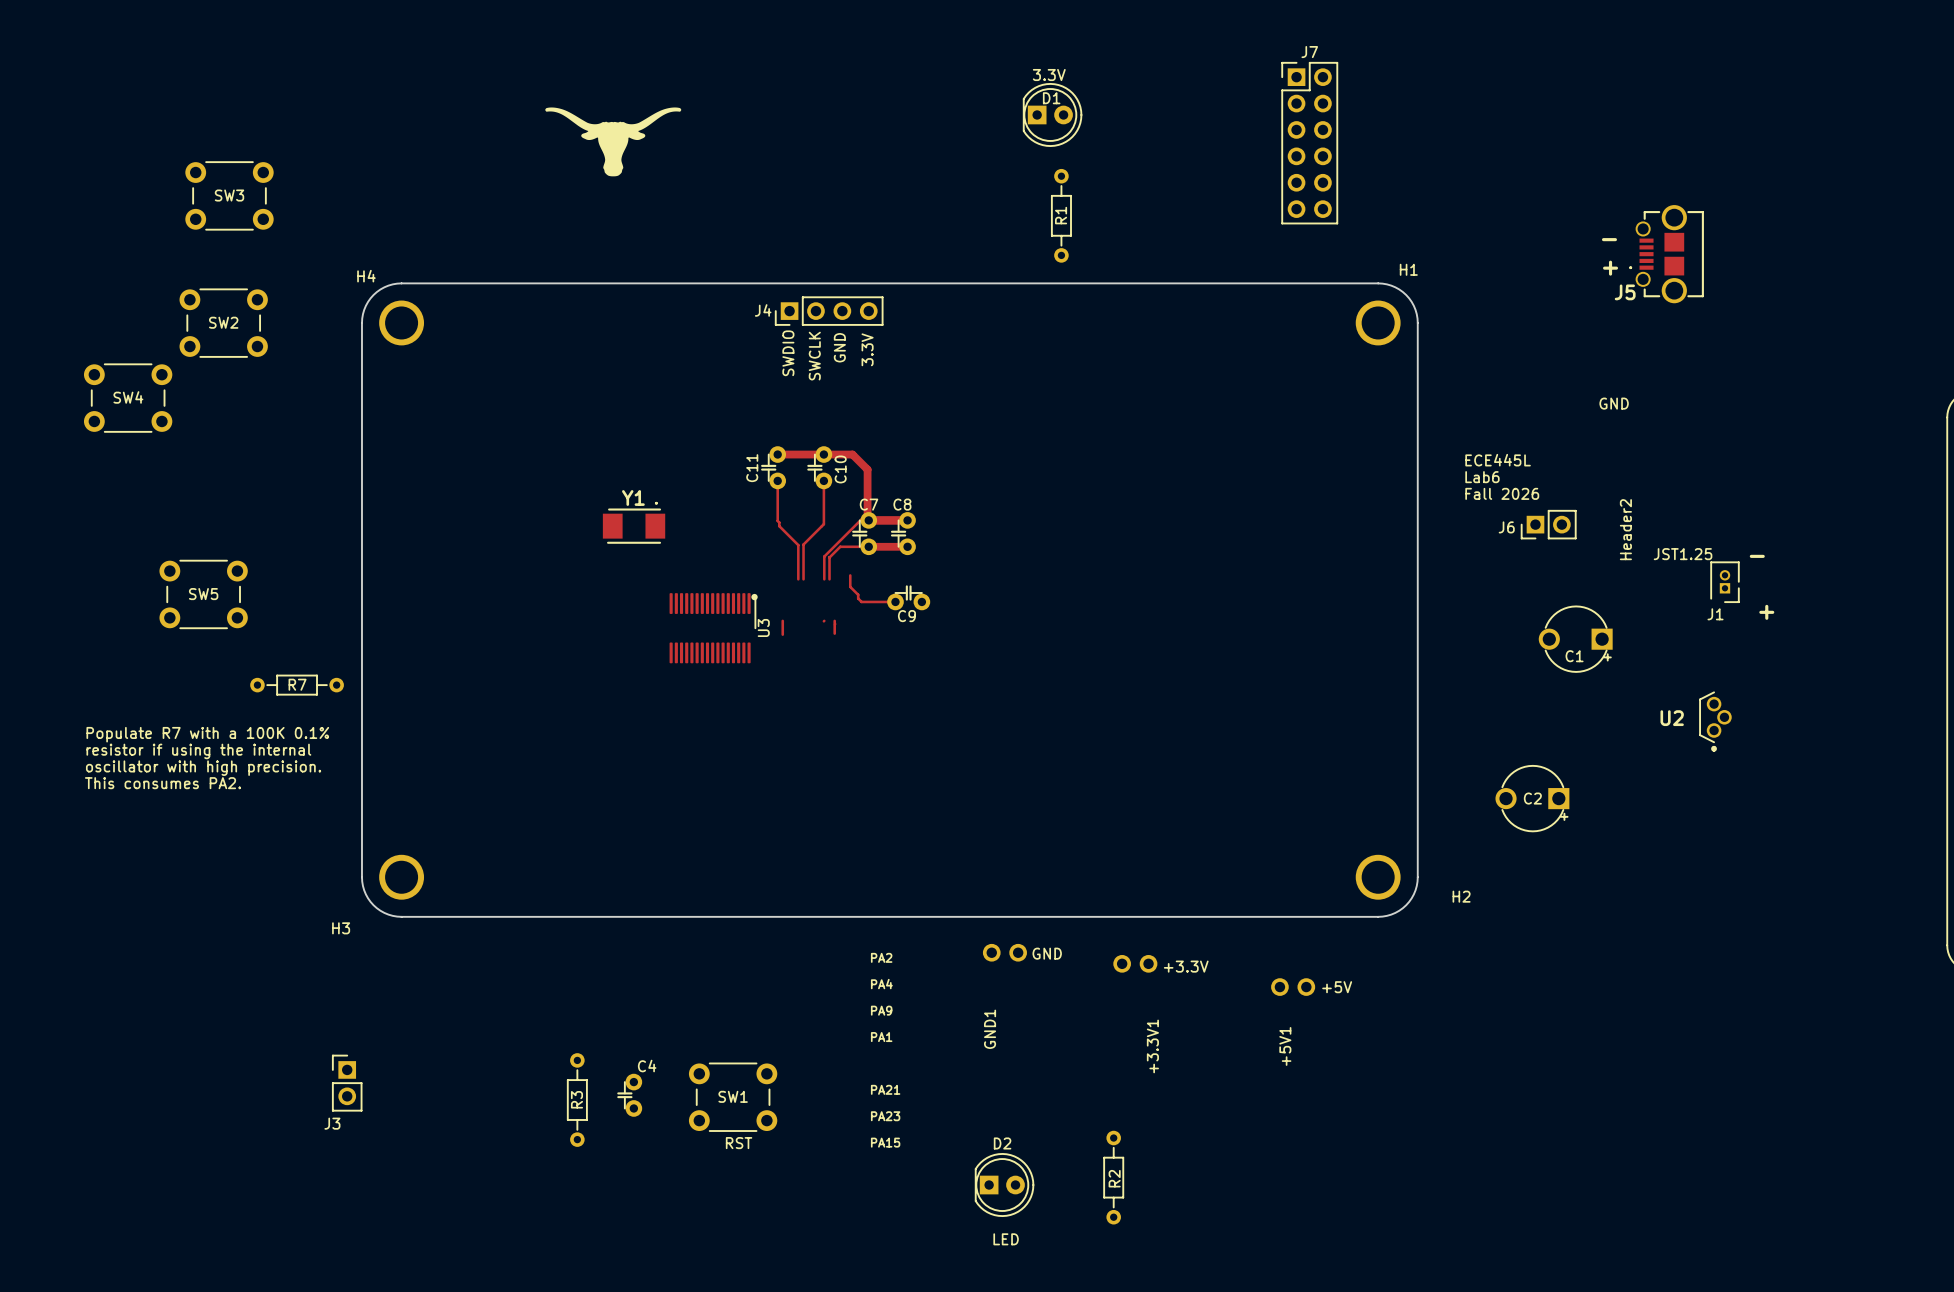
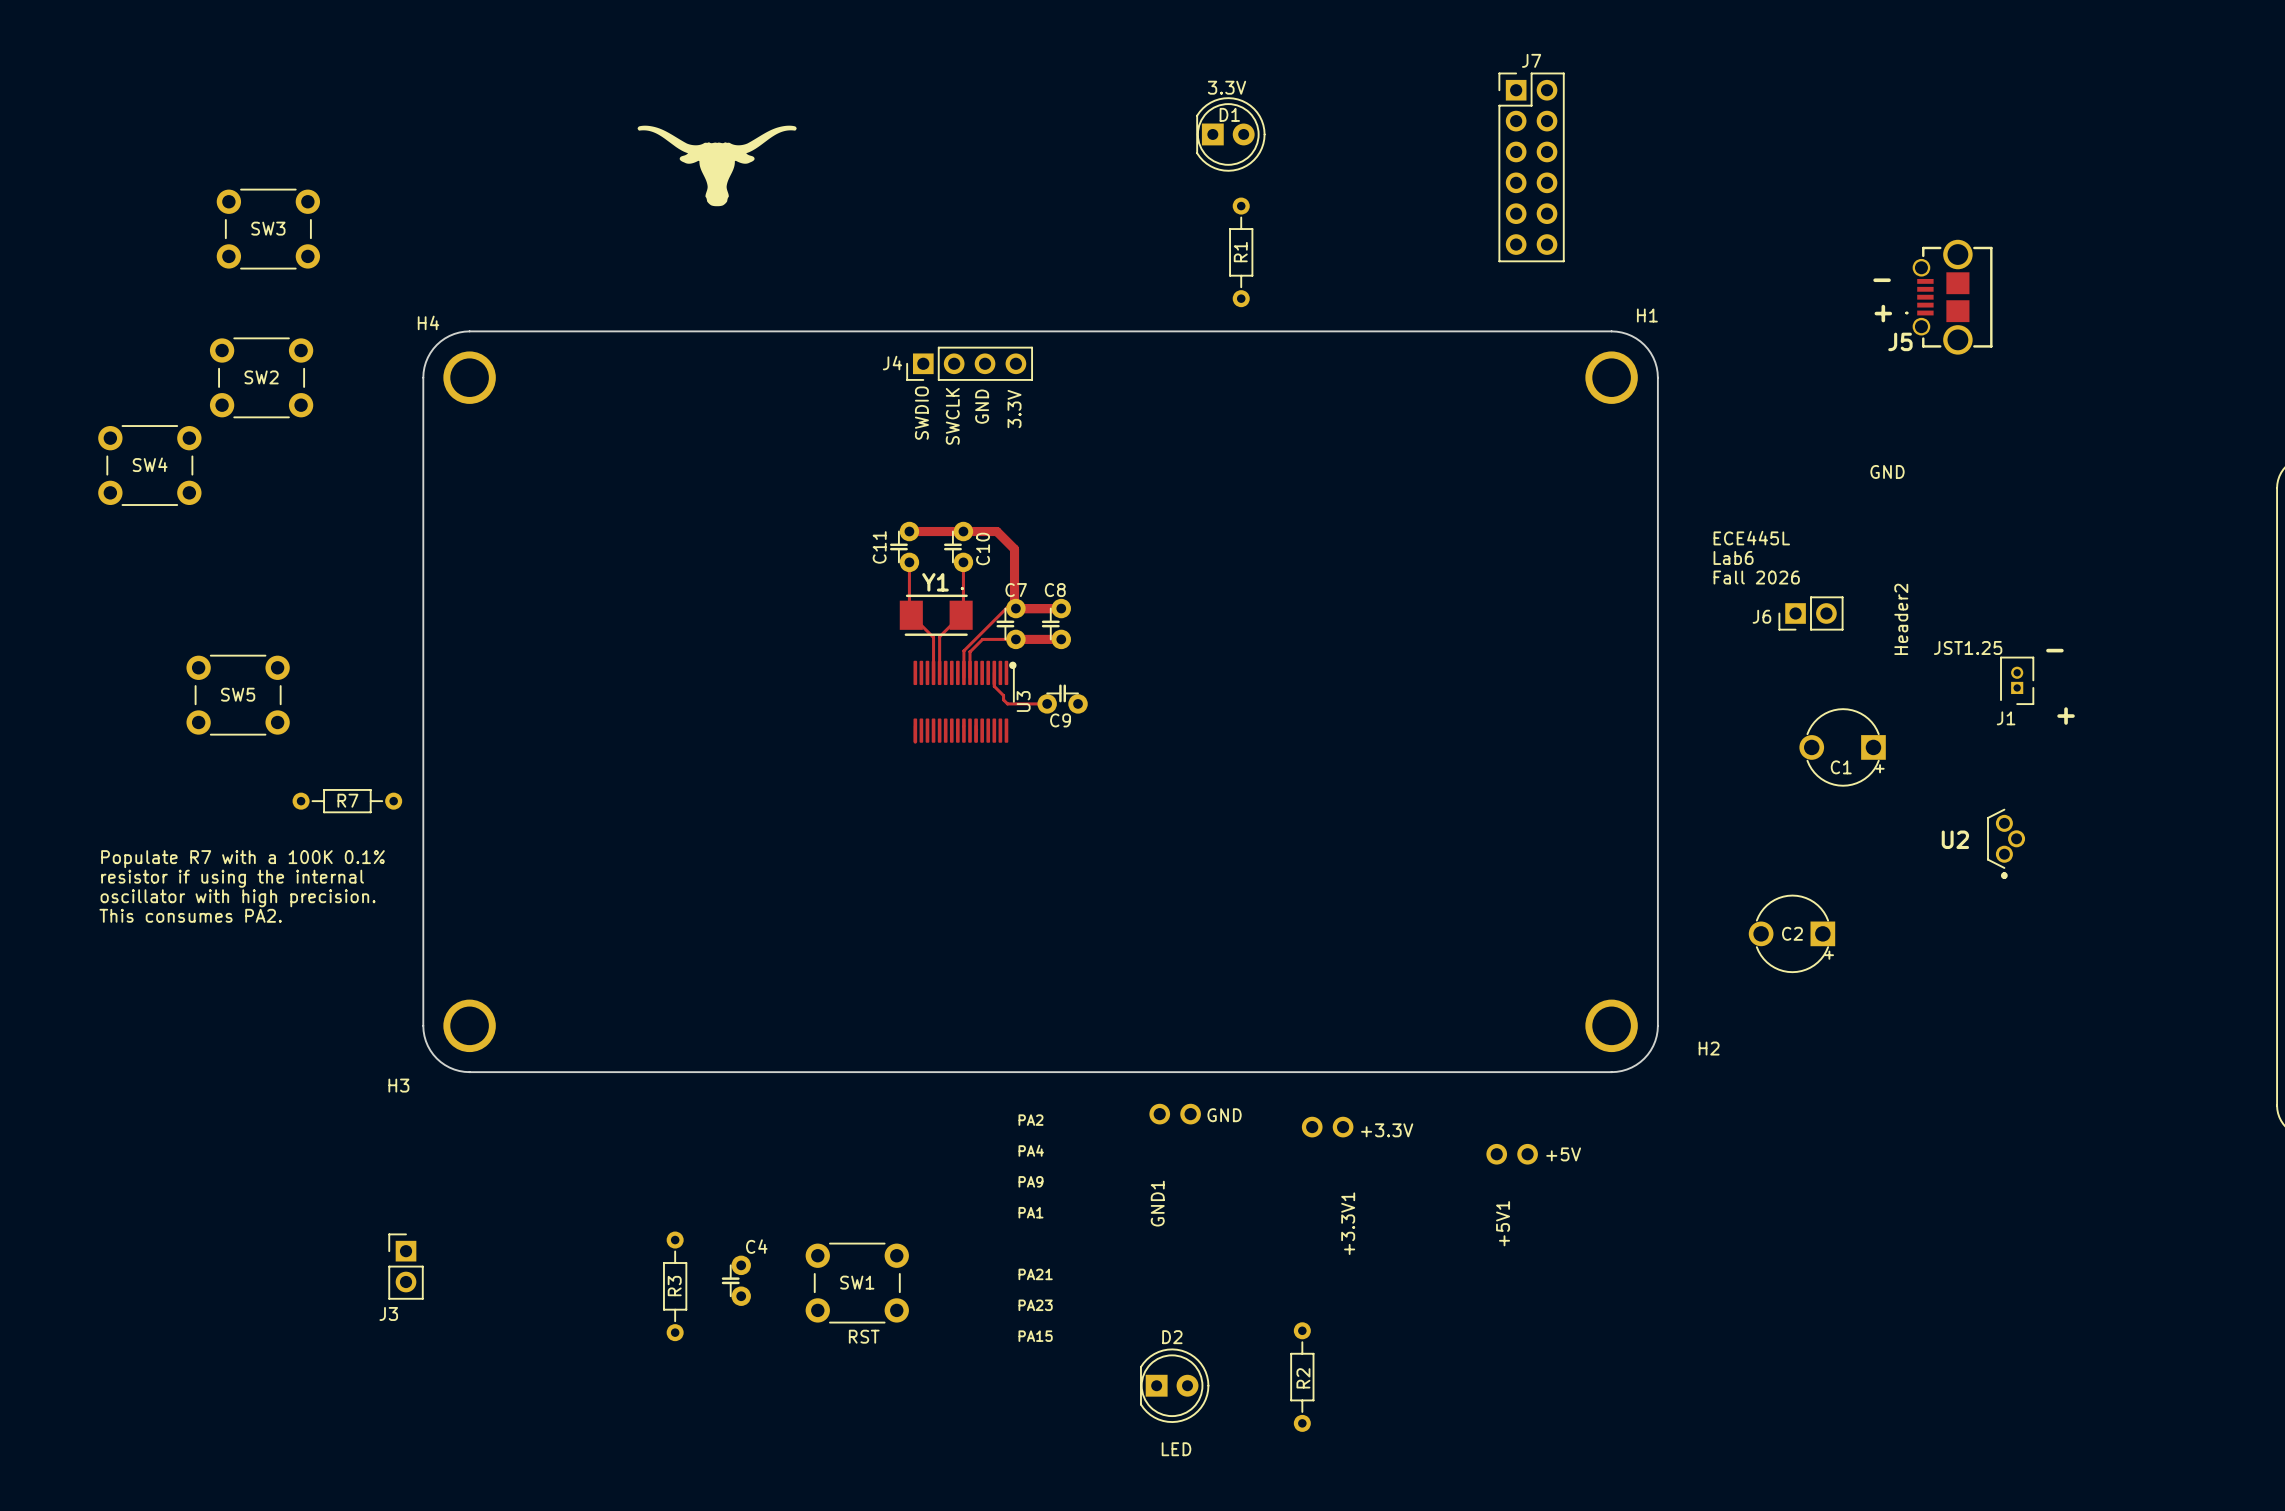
Y1 position: (634, 523) -> (936, 611)
U3 position: (713, 628) -> (965, 701)

